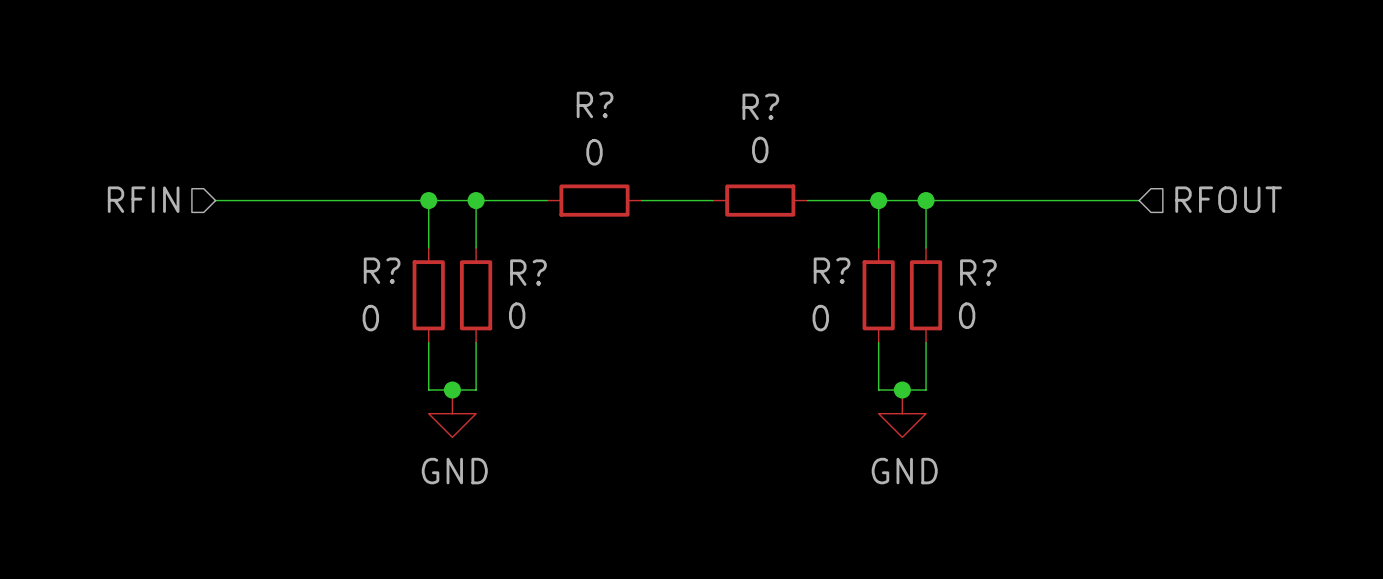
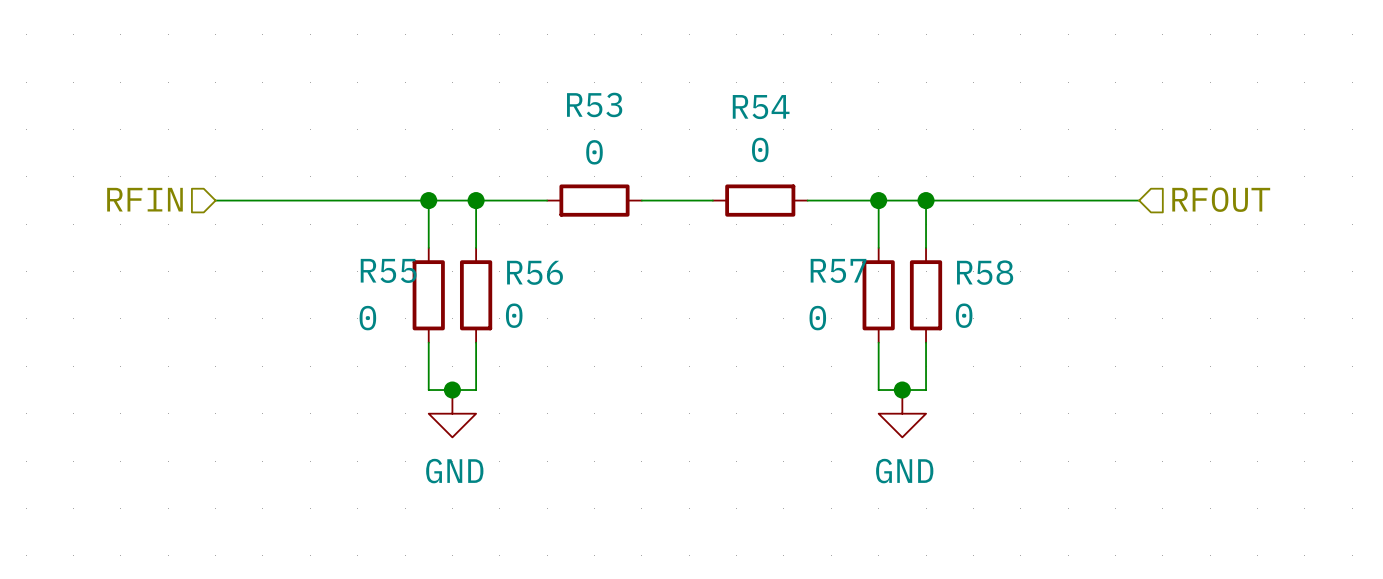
R? name: R? (595, 104) -> R53 (594, 104)
R? name: R? (760, 106) -> R54 (761, 107)
R? name: R? (382, 270) -> R55 (388, 270)
R? name: R? (832, 270) -> R57 (838, 270)
R? name: R? (528, 272) -> R56 (535, 272)
R? name: R? (978, 272) -> R58 (985, 272)

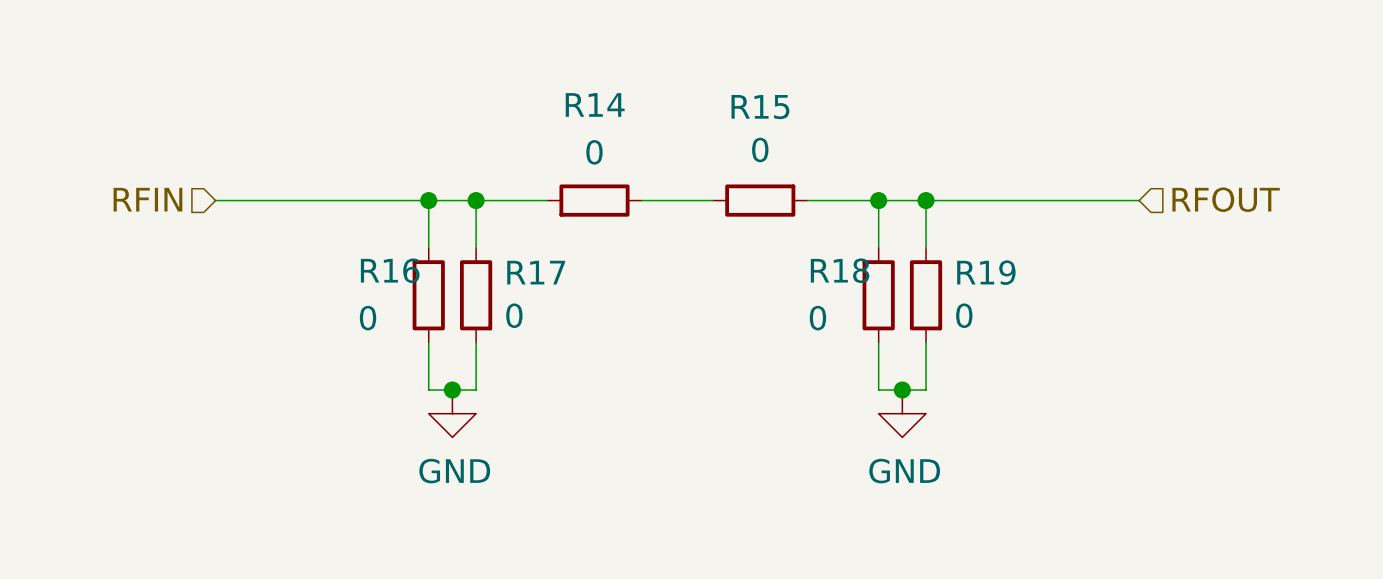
R53 name: R53 (594, 104) -> R14 (595, 104)
R54 name: R54 (761, 107) -> R15 (760, 107)
R55 name: R55 (388, 270) -> R16 (390, 270)
R57 name: R57 (838, 270) -> R18 (840, 270)
R56 name: R56 (535, 272) -> R17 (536, 272)
R58 name: R58 (985, 272) -> R19 (986, 272)

